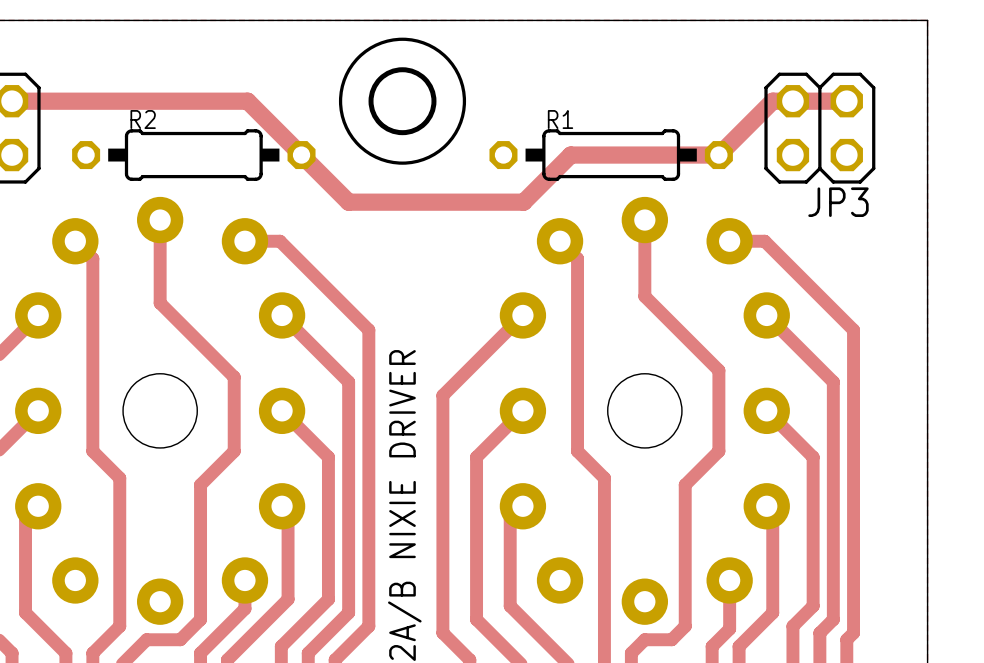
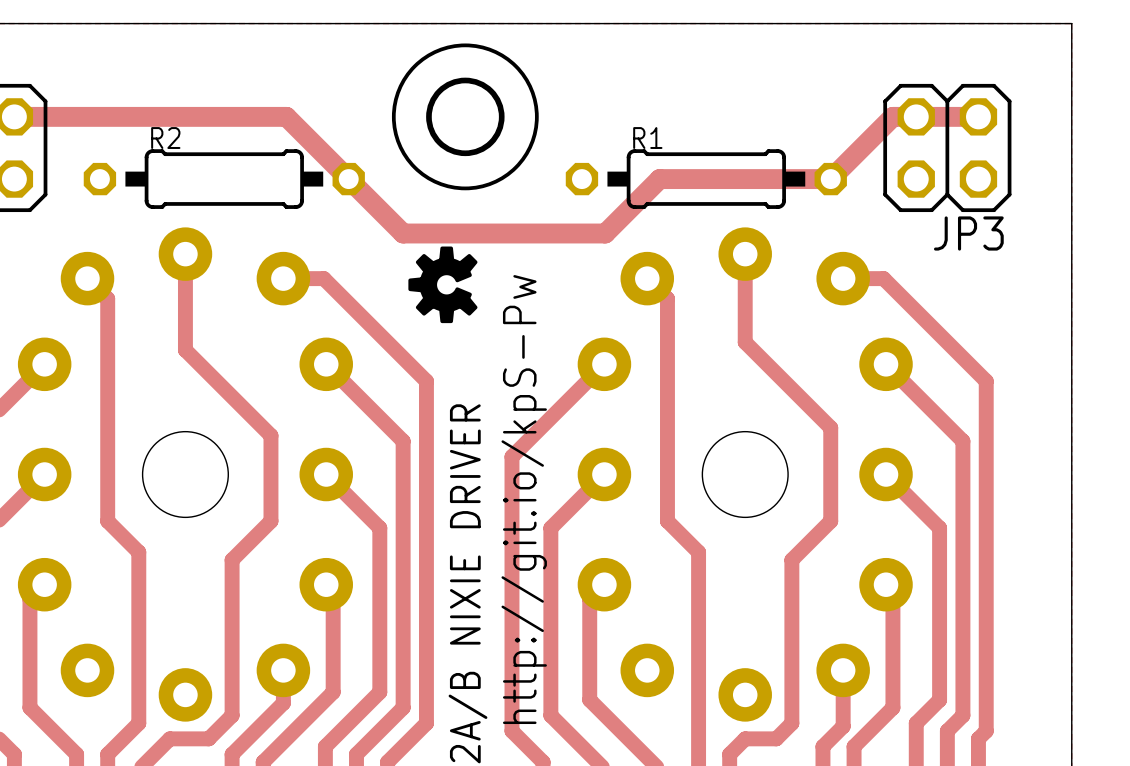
drawing: none -> [408, 246, 478, 324]
text: none -> http://git.io/kpS-Pw (524, 499)

